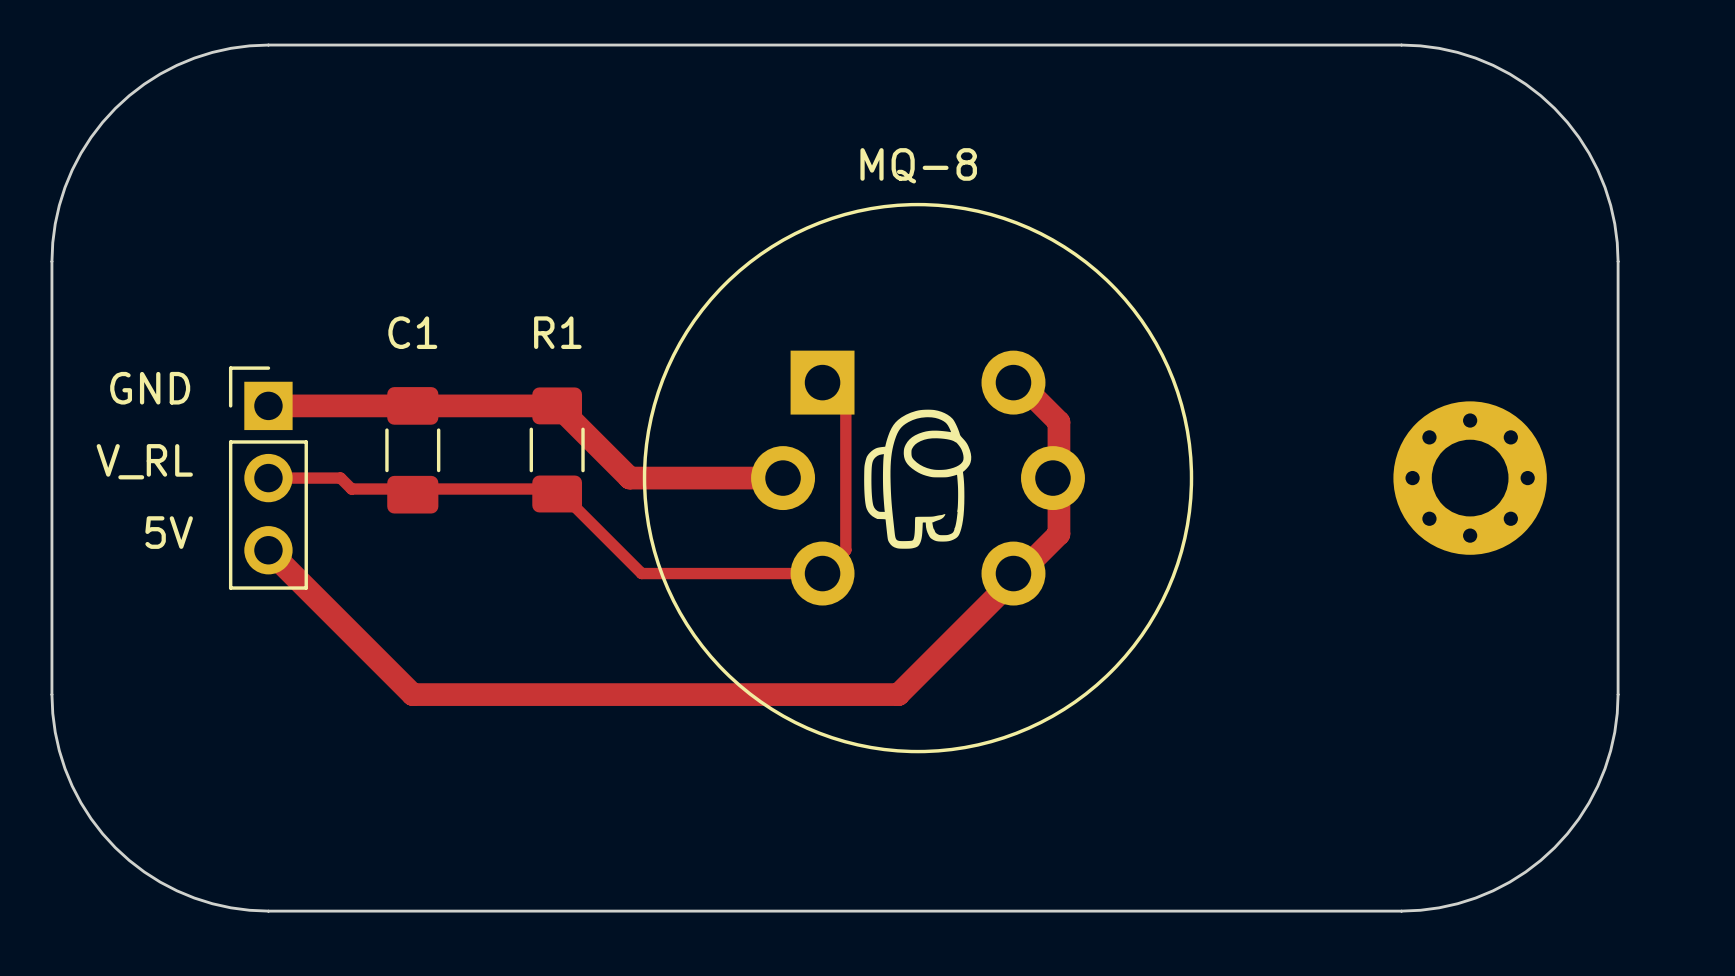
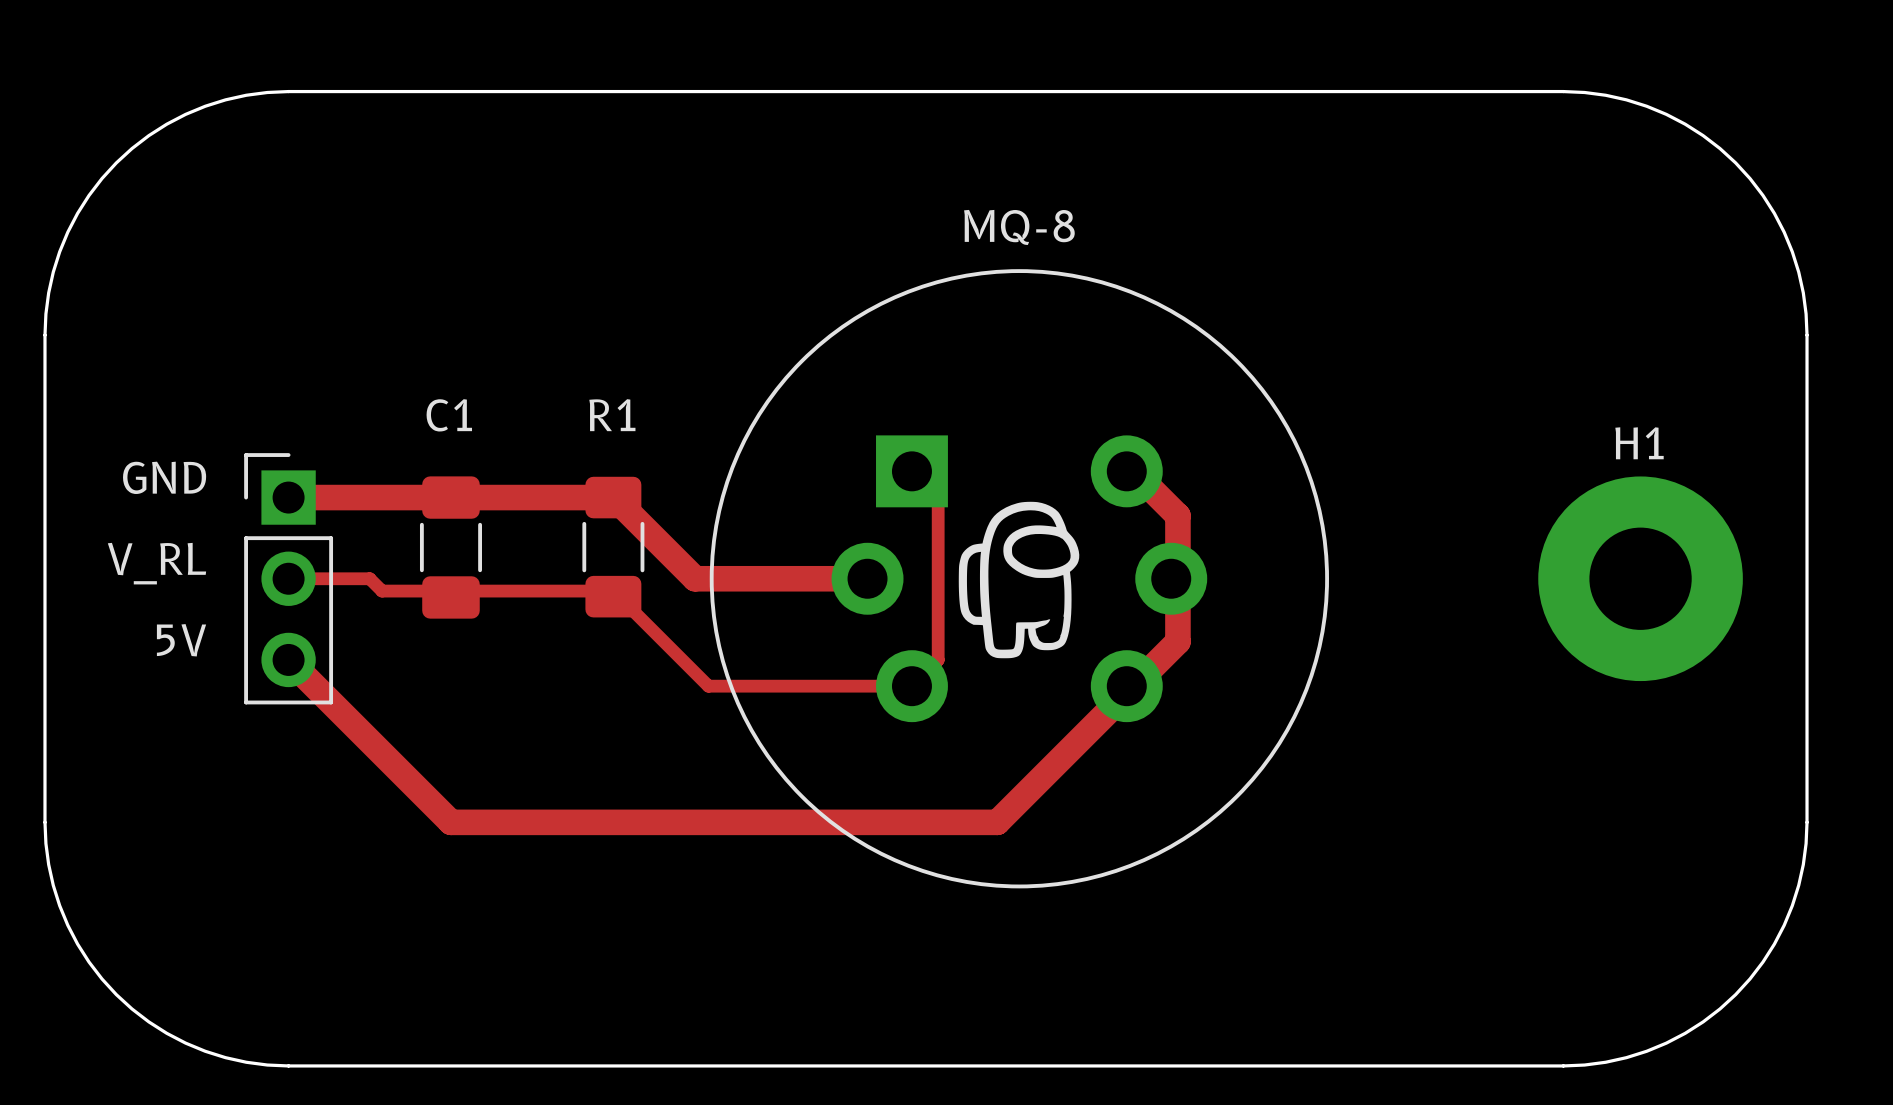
part: (1470, 478) -> none
H1: none -> (1640, 578)

